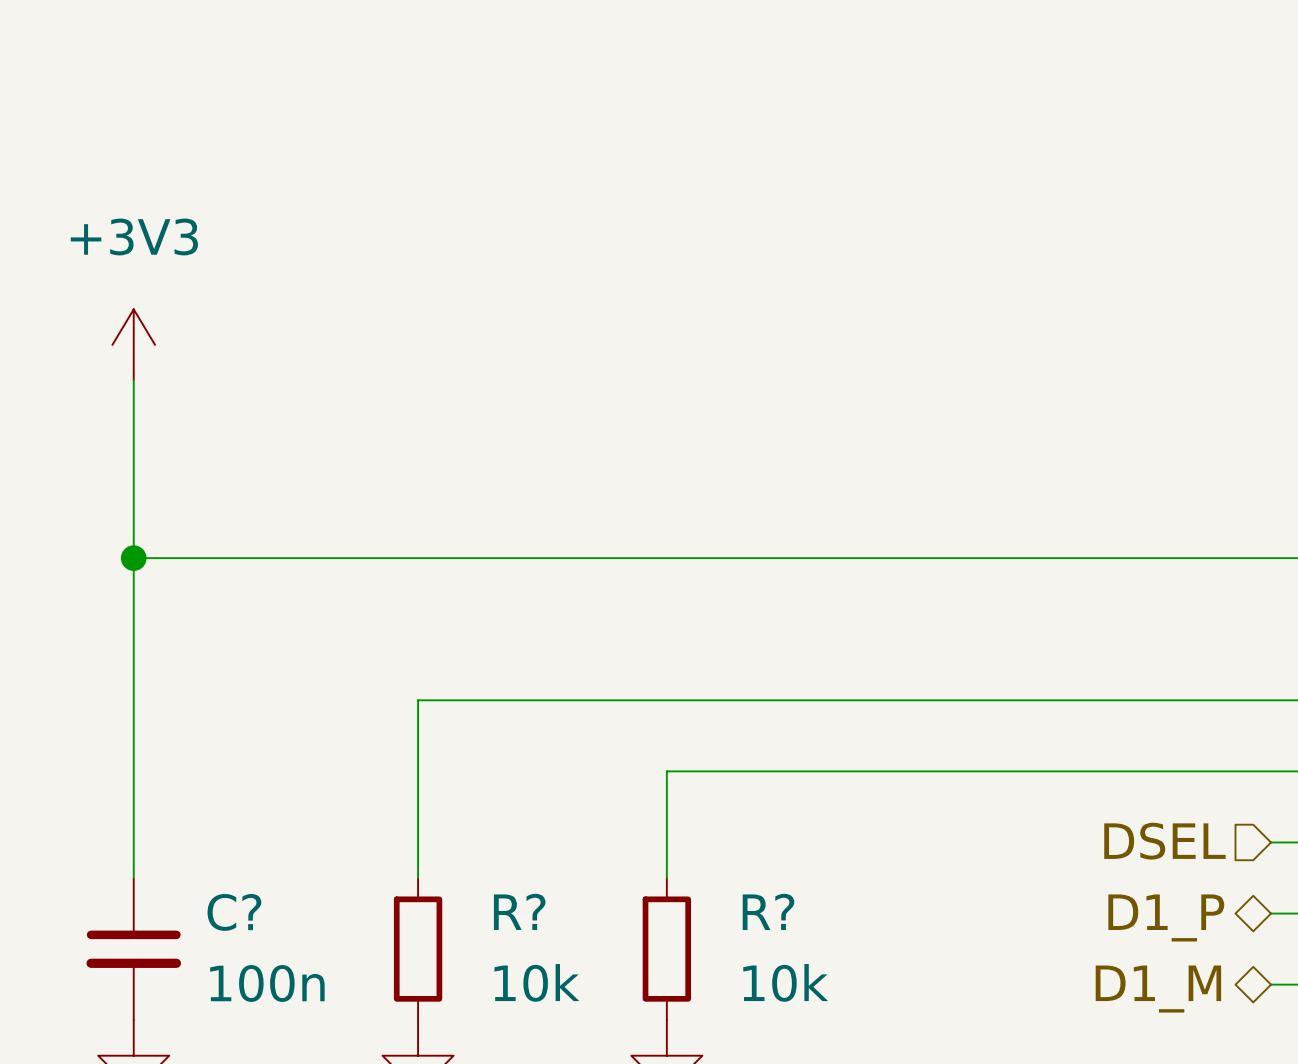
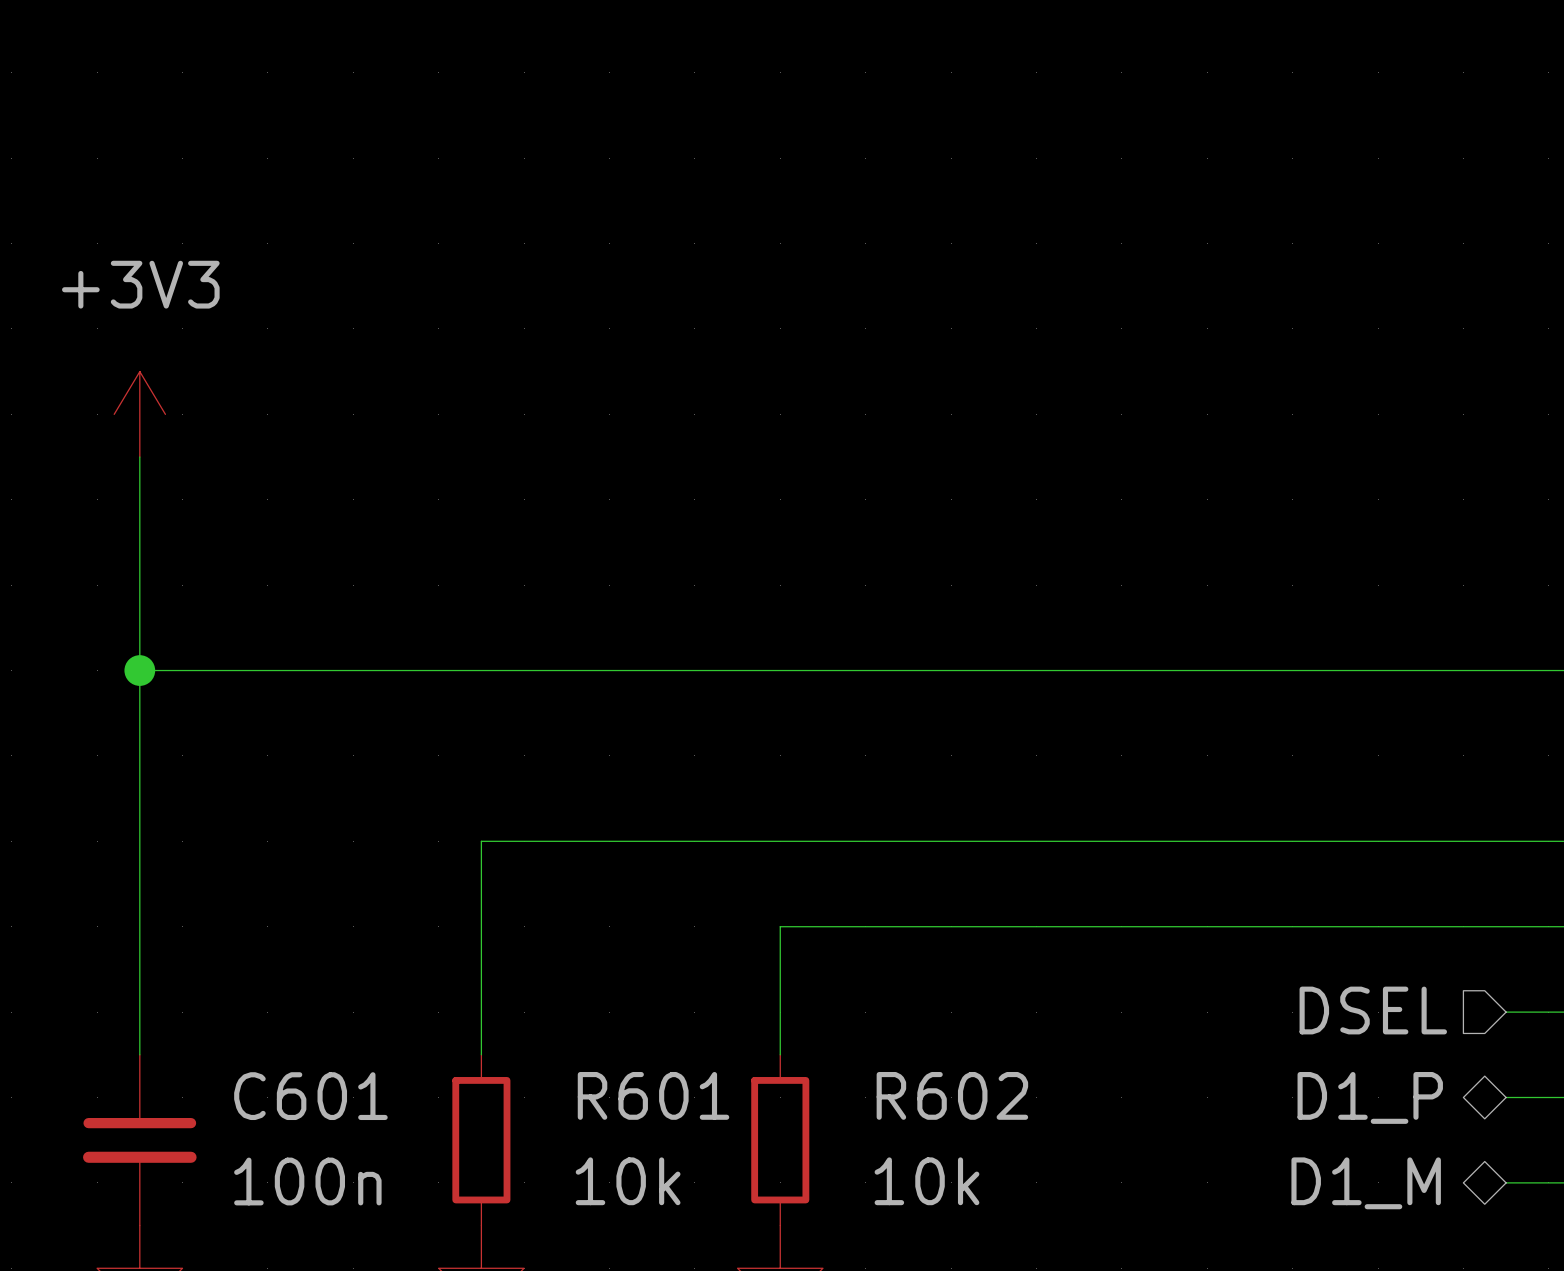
R? name: R? (519, 911) -> R601 (653, 1095)
R? name: R? (768, 911) -> R602 (952, 1095)
C? name: C? (234, 912) -> C601 (310, 1096)

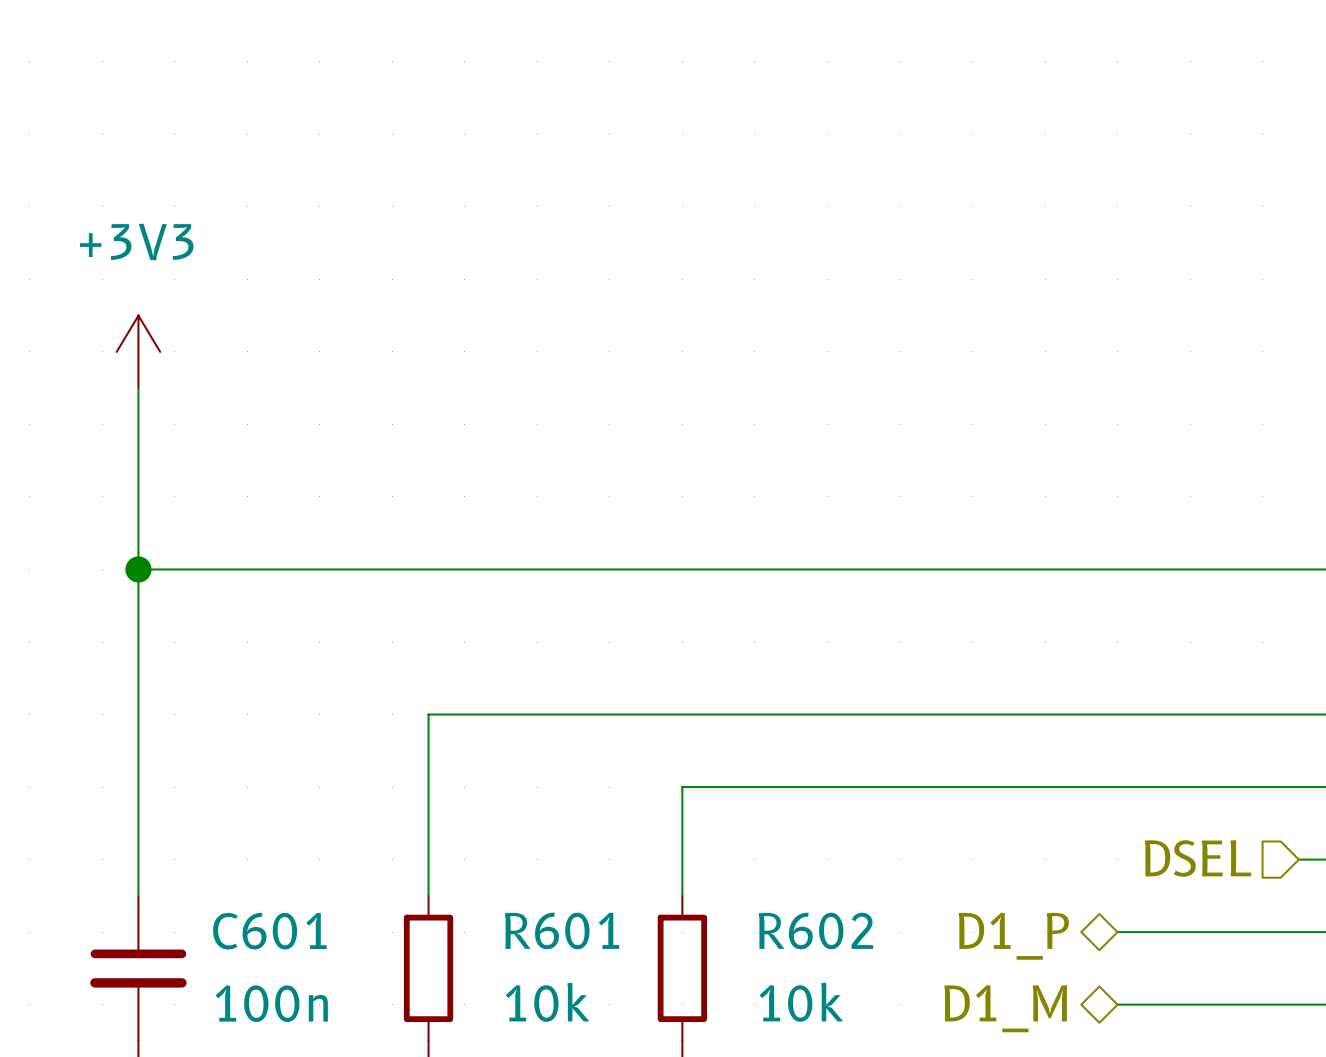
wire: none -> (1117, 932) (1298, 932)
hierarchical label position: D1_P (1370, 1097) -> D1_P (1013, 936)
wire: none -> (1117, 1004) (1298, 1004)
hierarchical label position: D1_M (1366, 1183) -> D1_M (1005, 1008)

